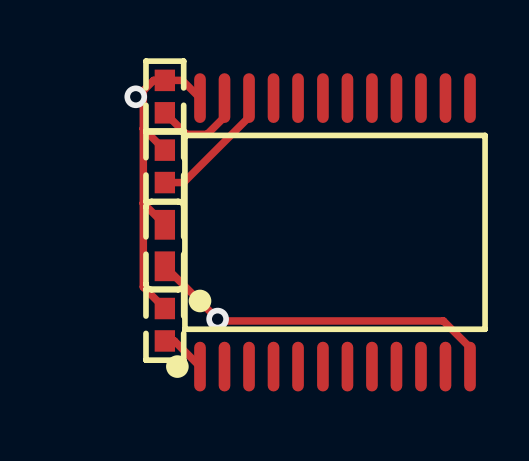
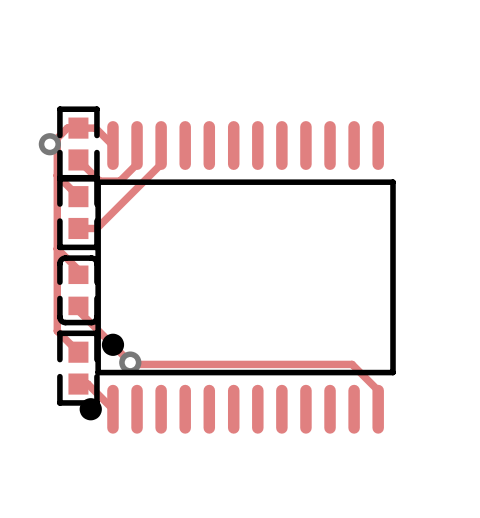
part footprint: [143, 198, 187, 293] -> [57, 255, 100, 326]

